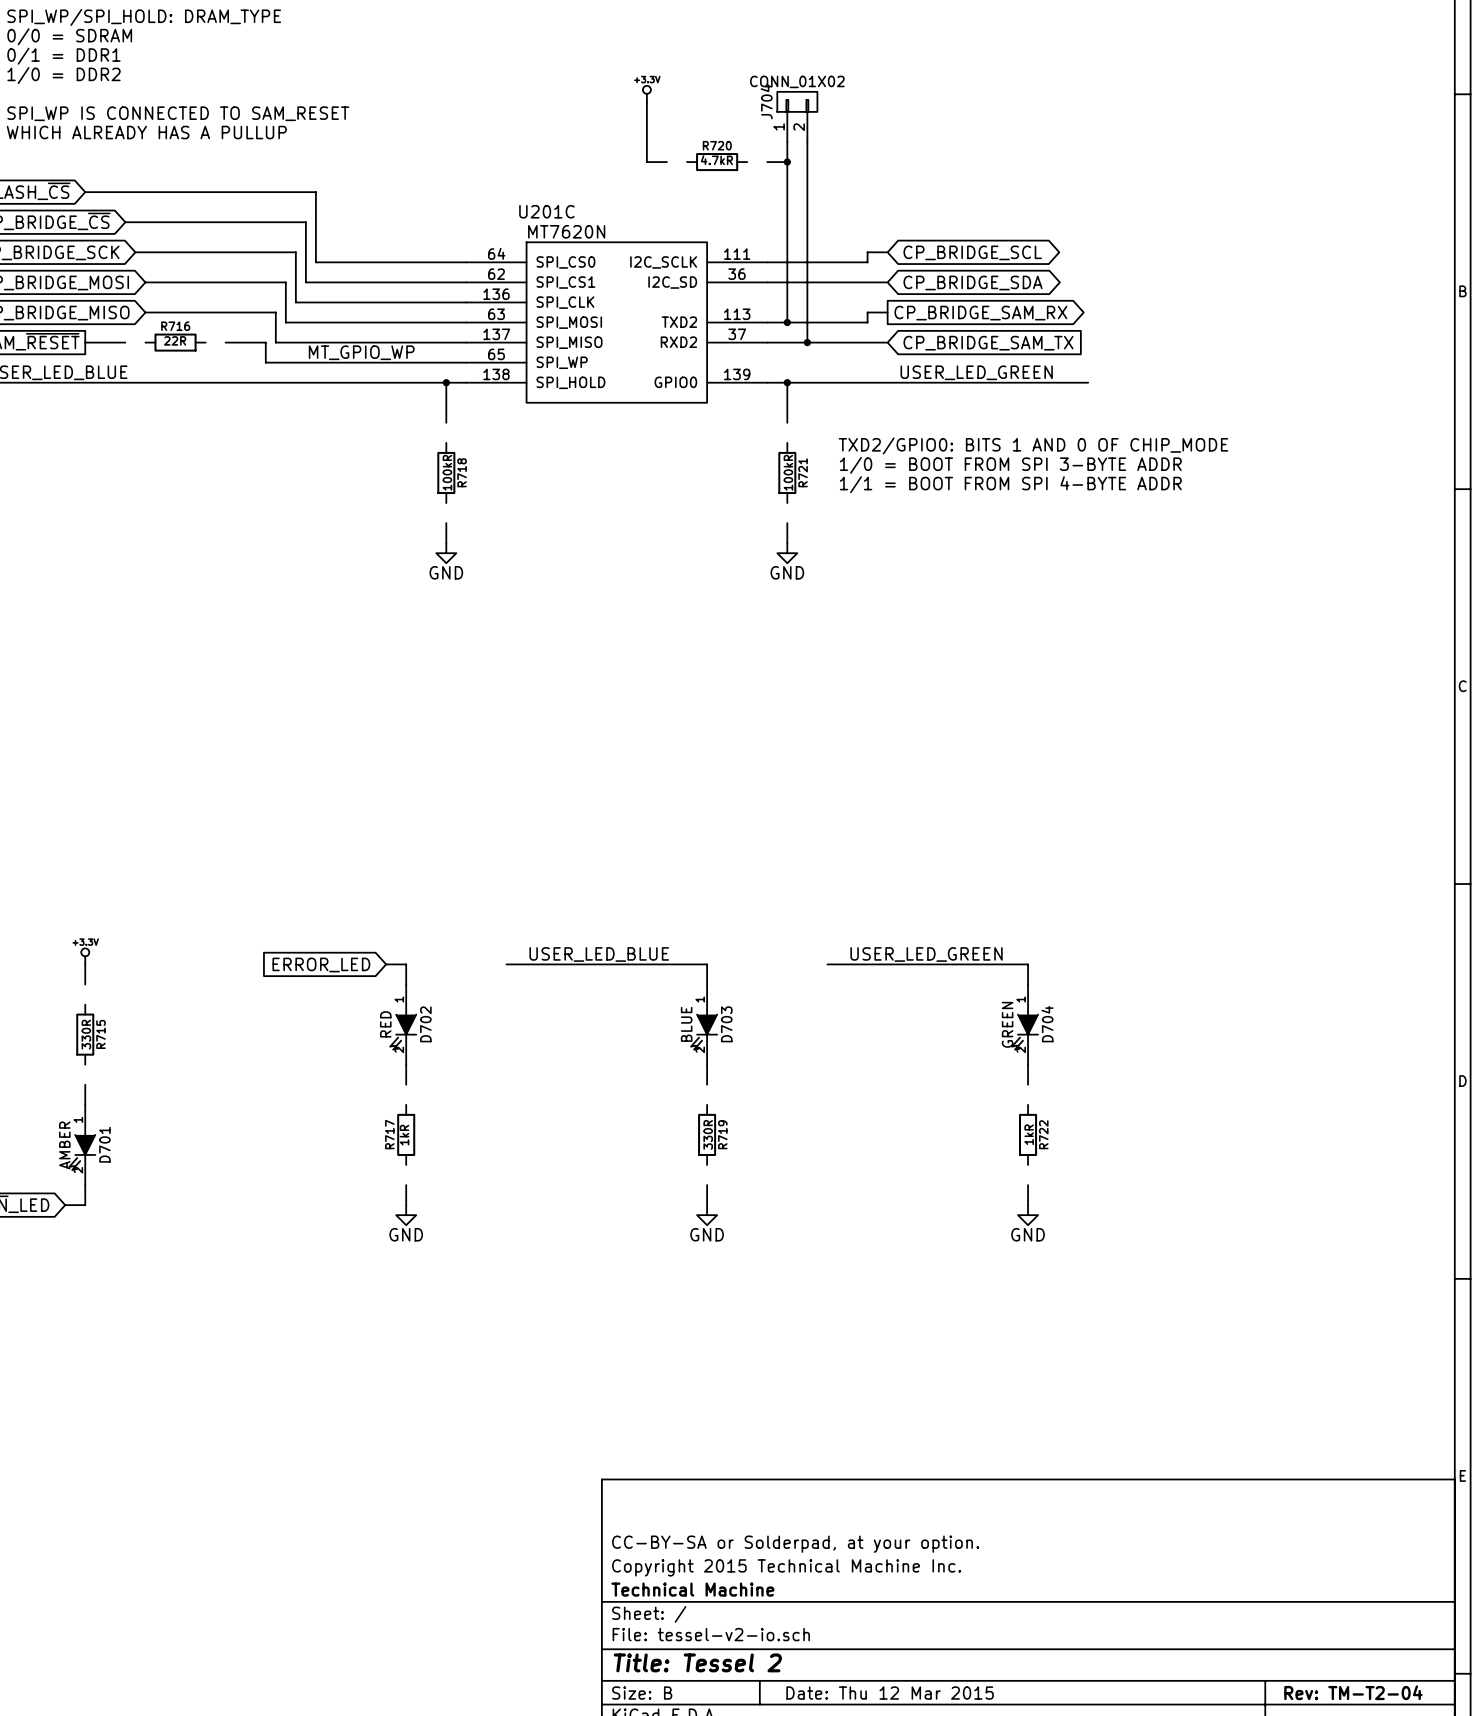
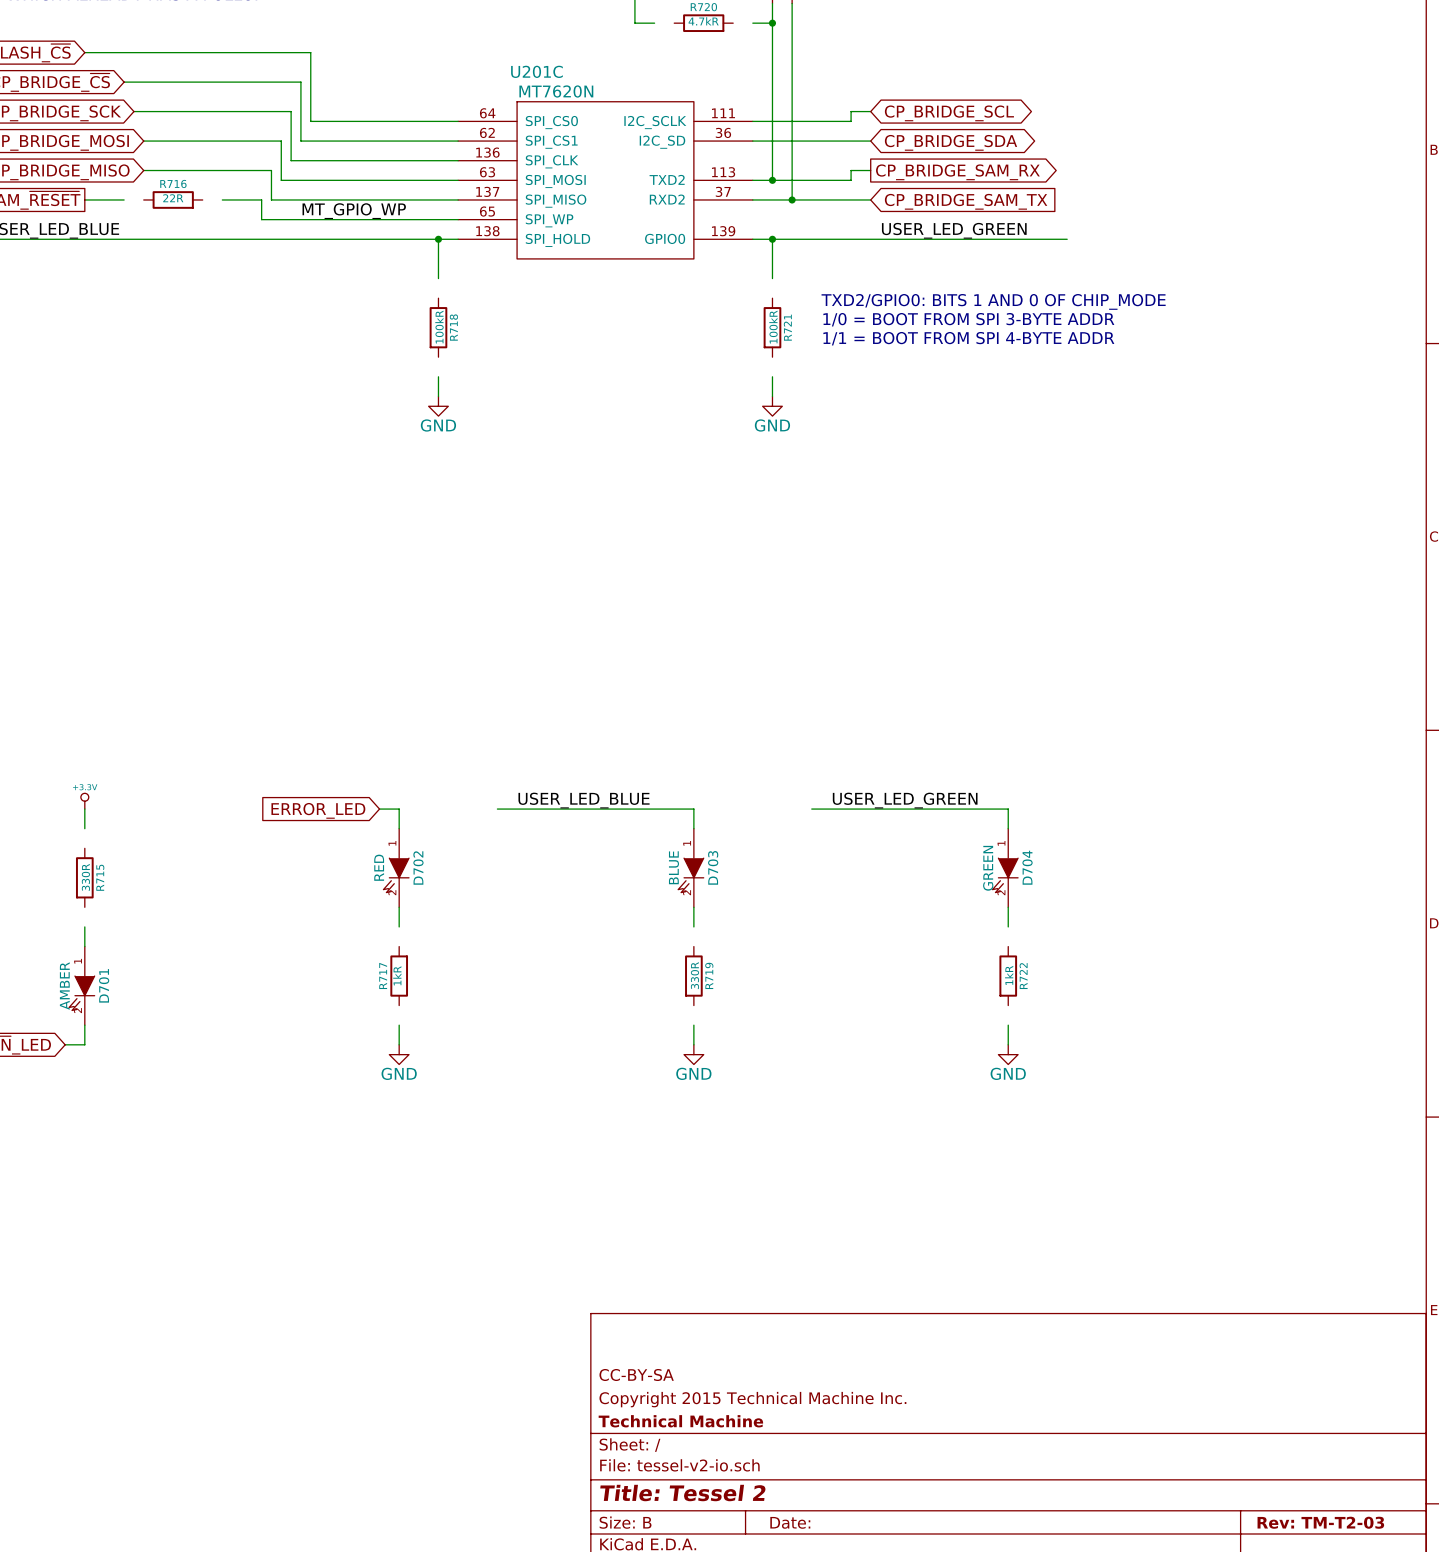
title block: CC-BY-SA or Solderpad, at your option. (795, 1544) -> CC-BY-SA (636, 1375)
title block: Rev: TM-T2-04 (1353, 1692) -> Rev: TM-T2-03 (1320, 1522)
title block: Date: Thu 12 Mar 2015 (890, 1693) -> Date: (790, 1522)

